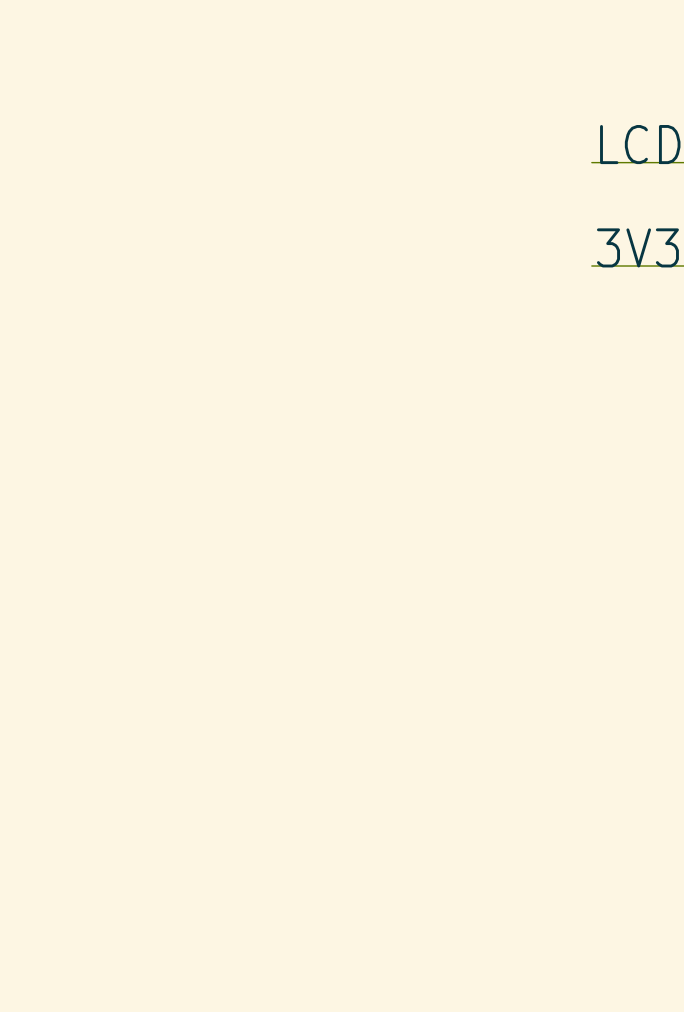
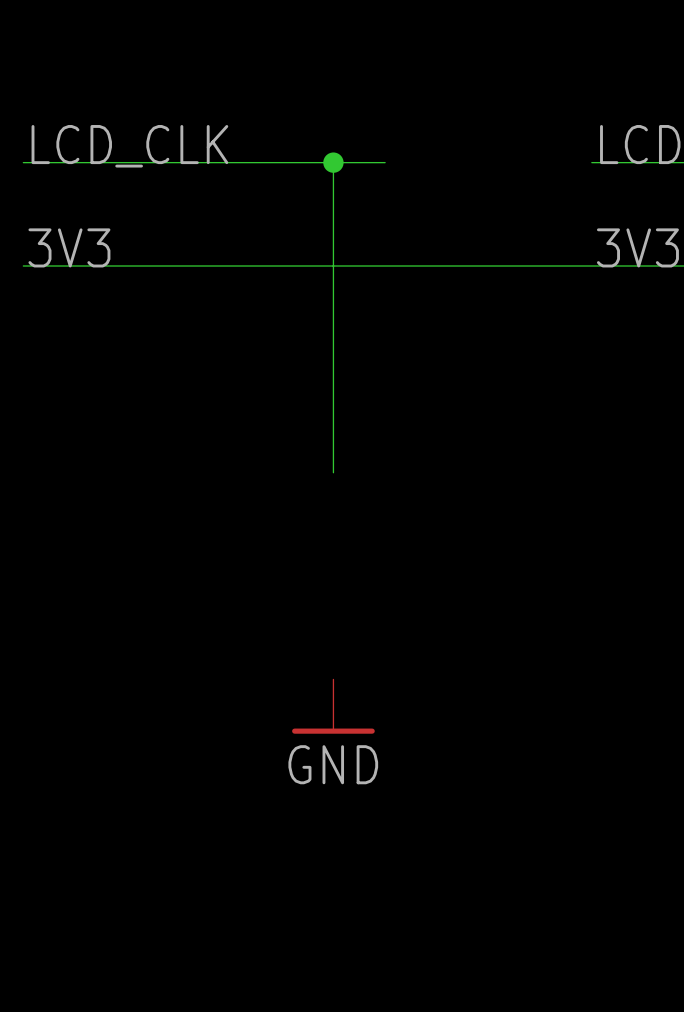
label: none -> LCD_CLK (129, 146)
wire: none -> (23, 162) (385, 162)
wire: none -> (333, 162) (333, 472)
junction: none -> (333, 162)
label: none -> 3V3 (69, 247)
wire: none -> (23, 266) (591, 266)
power symbol: none -> GND (333, 706)

